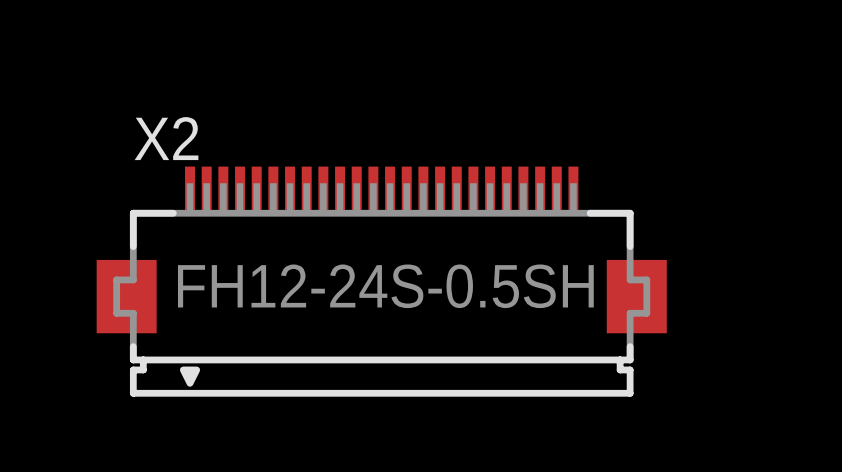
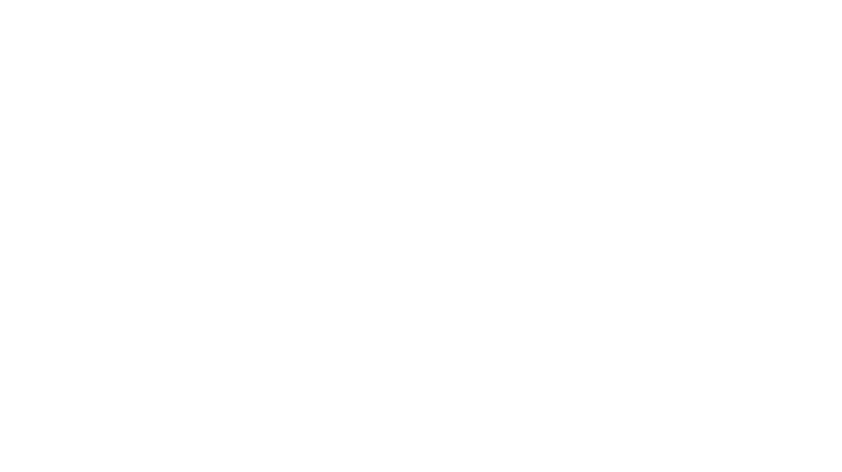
X2: FH12-24S-0.5SH (381, 281) -> none

